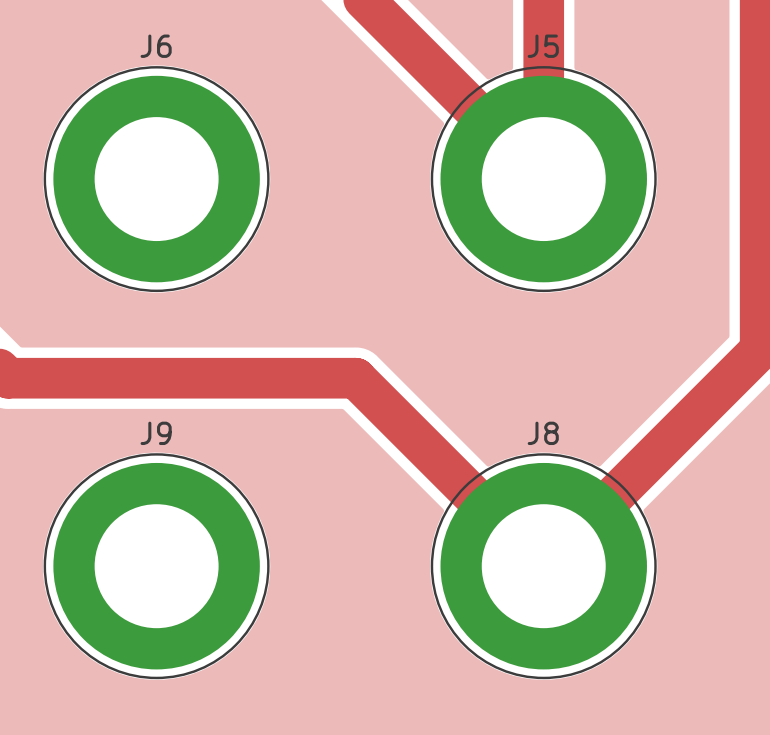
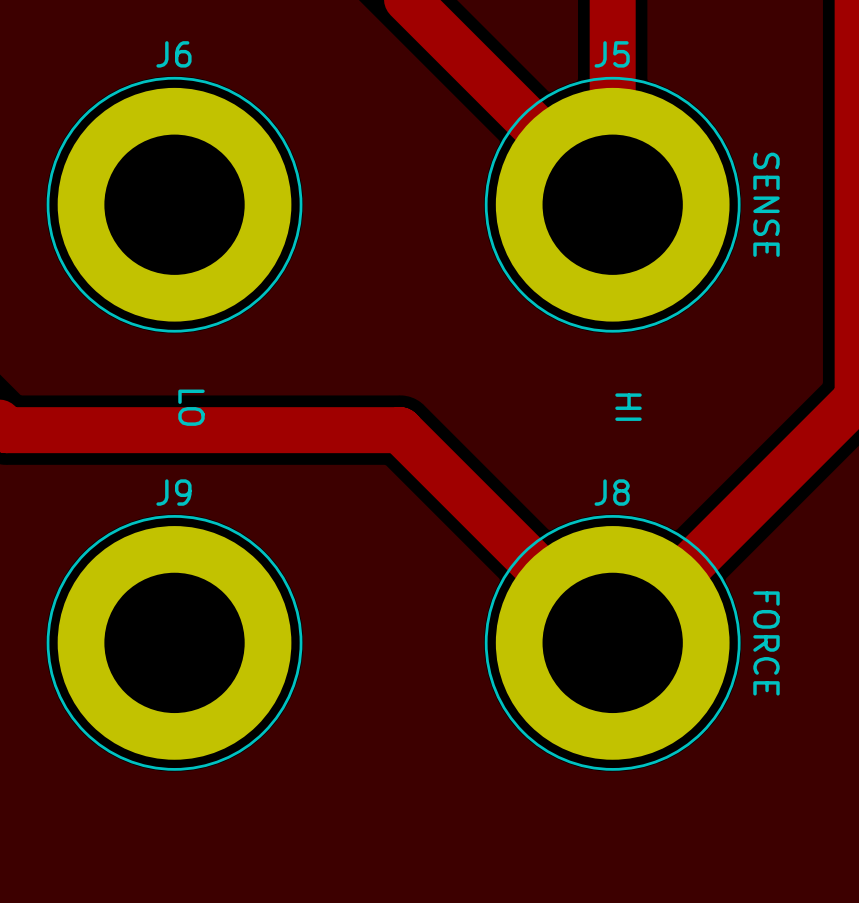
text: none -> SENSE (766, 204)
text: none -> HI (628, 407)
text: none -> LO (191, 407)
text: none -> FORCE (766, 643)

